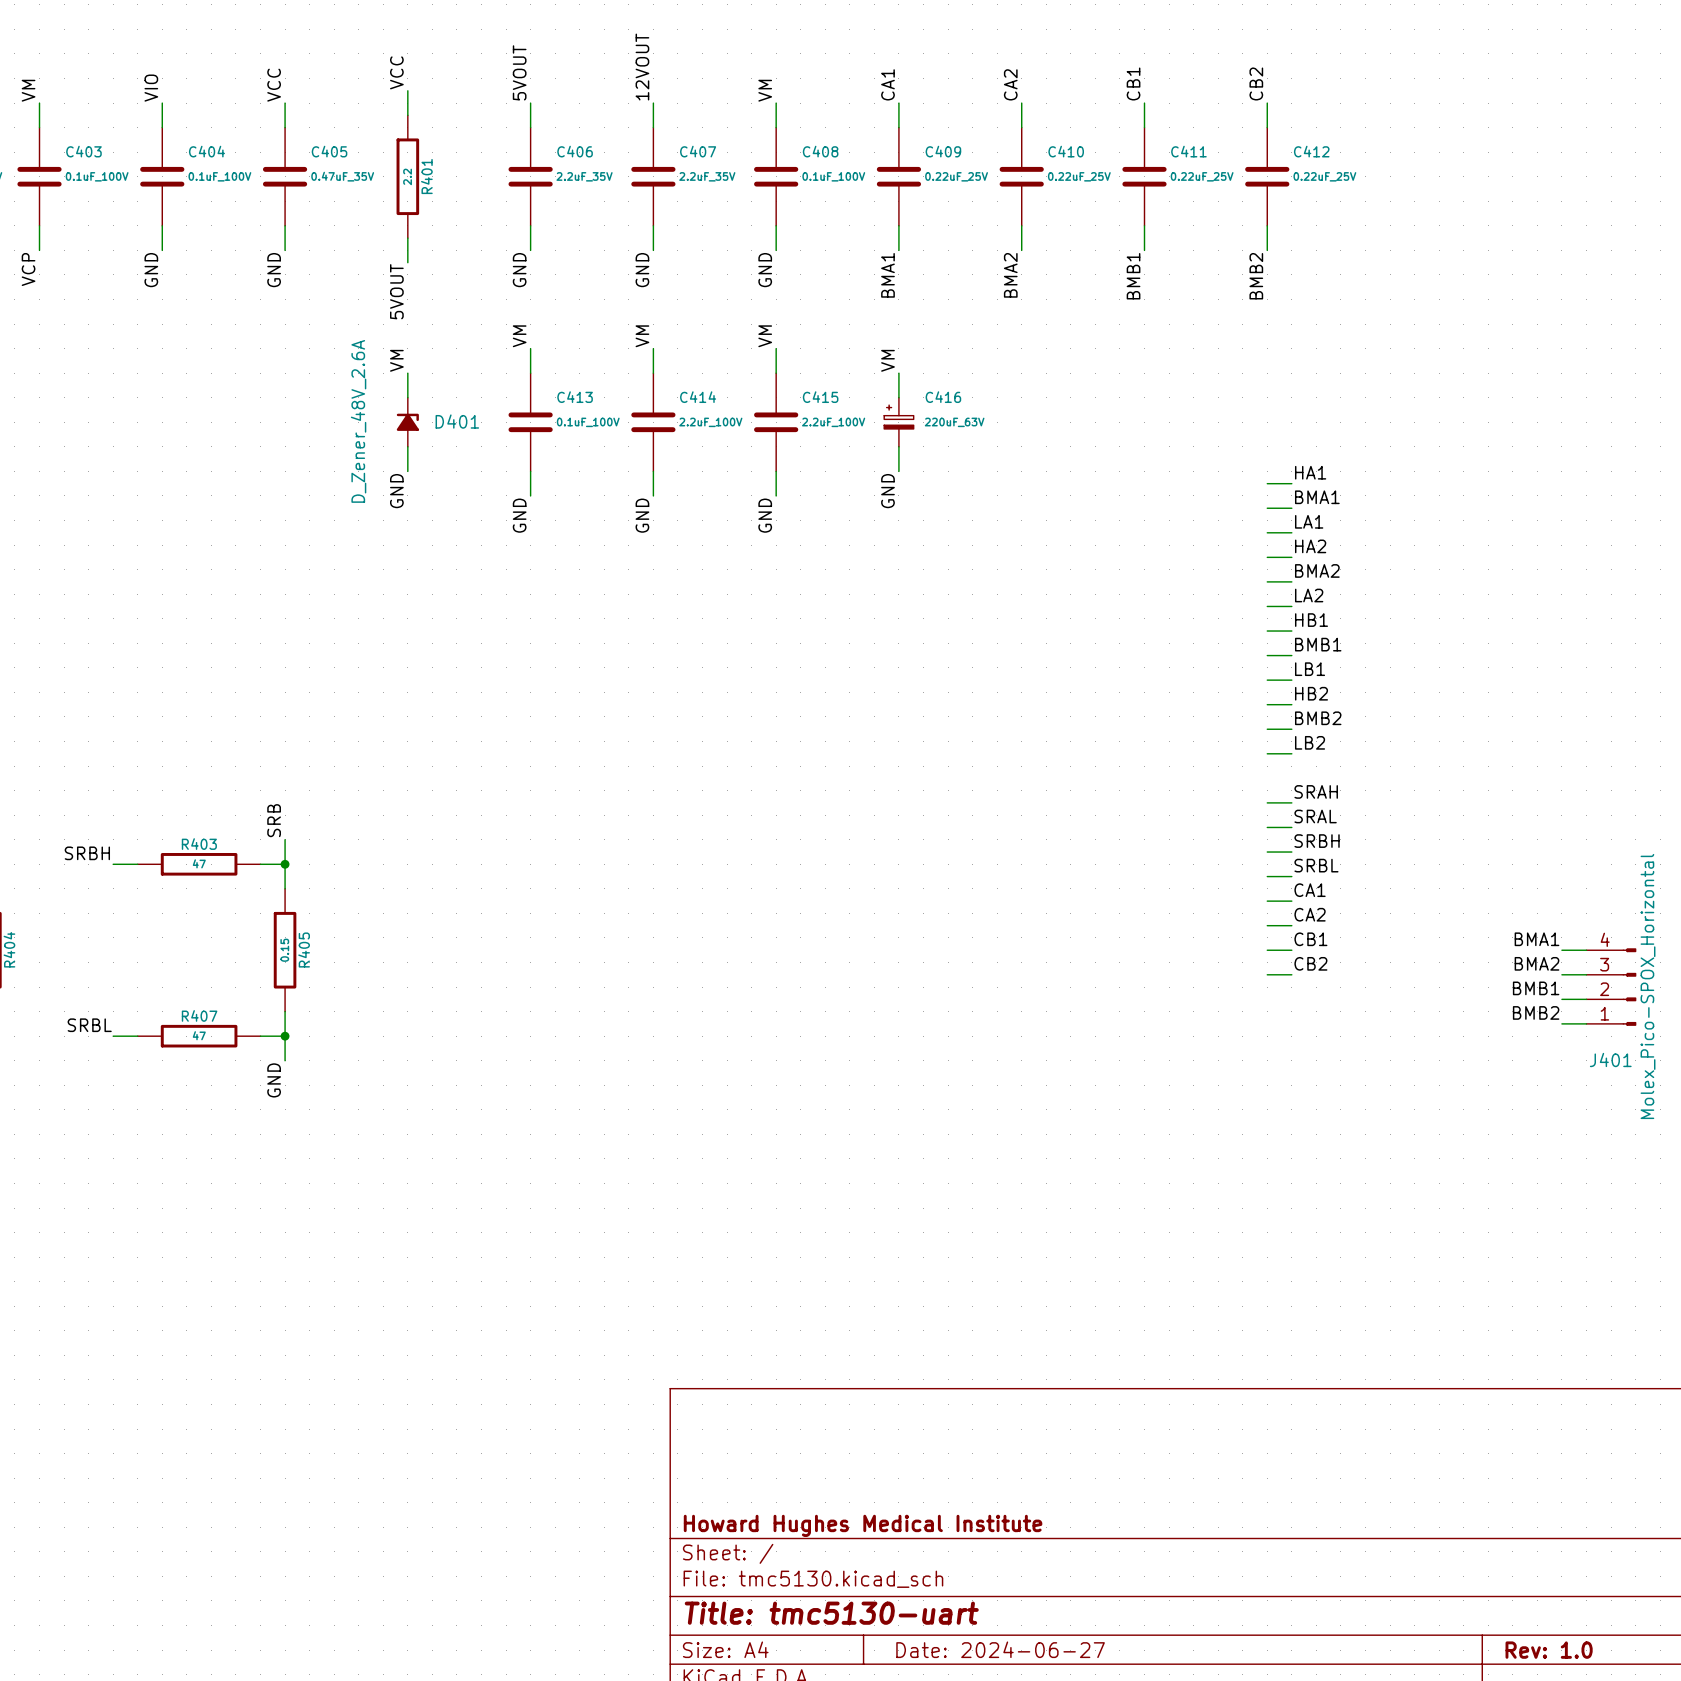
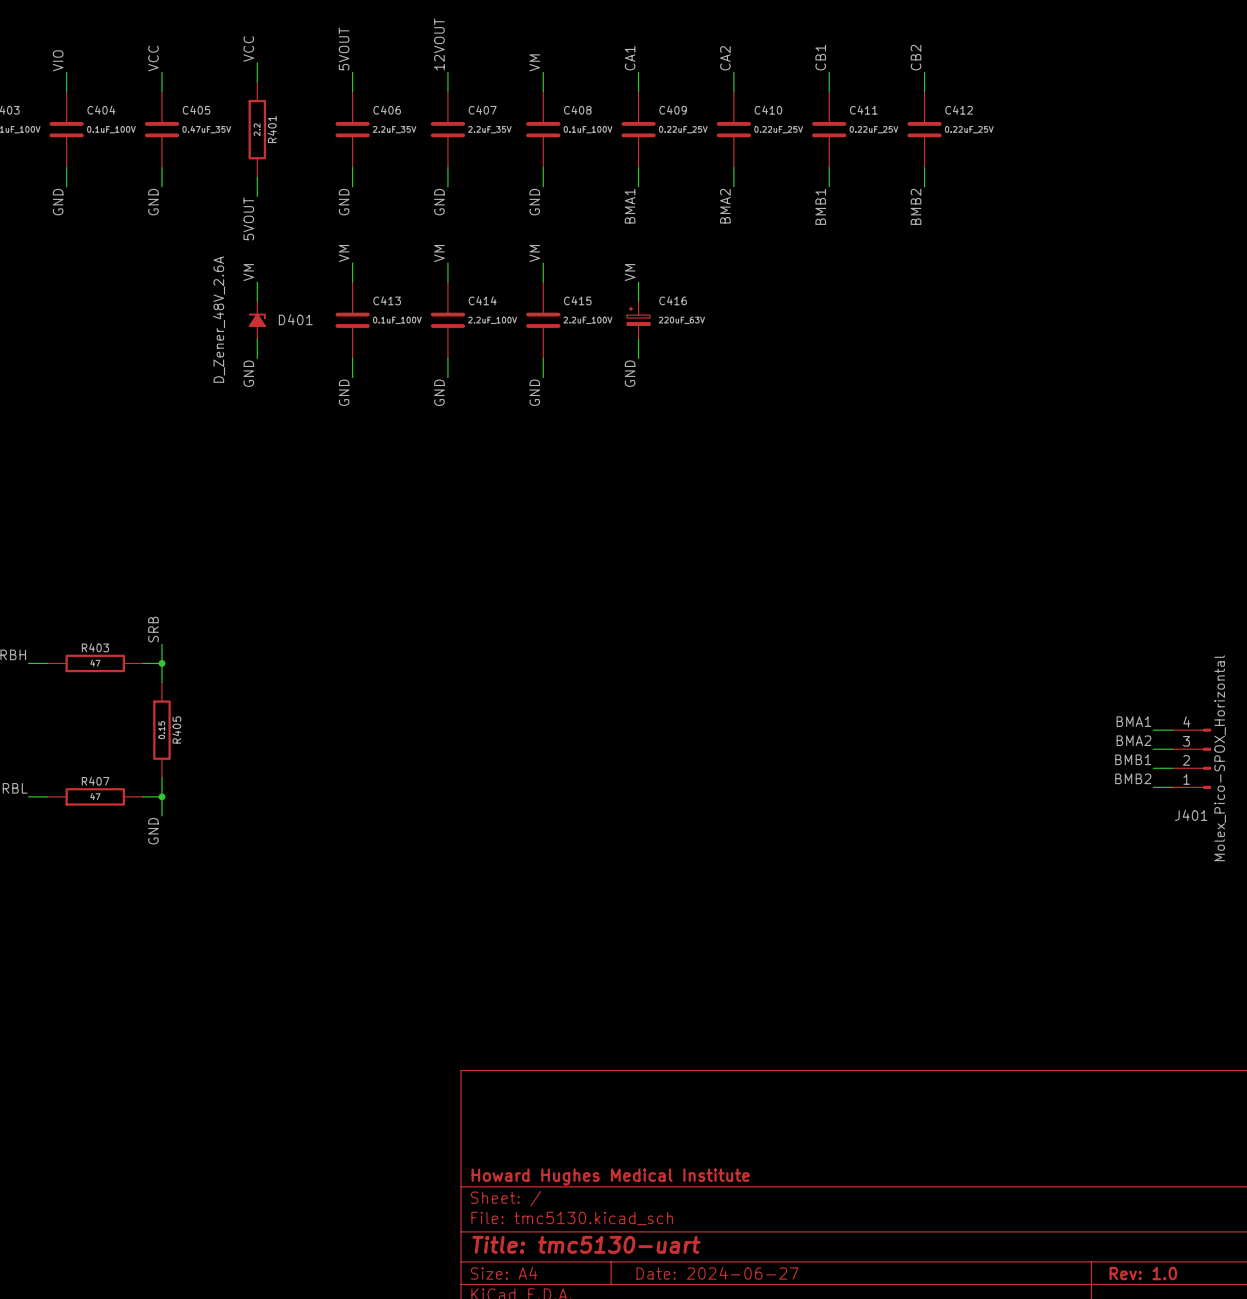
label: HA1 (1310, 472) -> none
wire: (1267, 483) (1291, 483) -> none
label: BMA1 (1317, 497) -> none
wire: (1267, 508) (1291, 508) -> none
label: LA1 (1309, 521) -> none
wire: (1267, 532) (1291, 532) -> none
label: HA2 (1310, 546) -> none
wire: (1267, 557) (1291, 557) -> none
label: BMA2 (1317, 570) -> none
wire: (1267, 581) (1291, 581) -> none
label: LA2 (1309, 595) -> none
wire: (1267, 606) (1291, 606) -> none
label: HB1 (1311, 620) -> none
wire: (1267, 631) (1291, 631) -> none
label: BMB1 (1318, 644) -> none
wire: (1267, 655) (1291, 655) -> none
label: LB1 (1310, 669) -> none
wire: (1267, 680) (1291, 680) -> none
label: HB2 (1311, 693) -> none
wire: (1267, 704) (1291, 704) -> none
label: BMB2 (1318, 718) -> none
wire: (1267, 729) (1291, 729) -> none
label: LB2 (1310, 742) -> none
wire: (1267, 753) (1291, 753) -> none
label: SRAH (1316, 791) -> none
wire: (1267, 802) (1291, 802) -> none
label: SRAL (1315, 816) -> none
wire: (1267, 827) (1291, 827) -> none
label: SRBH (1317, 841) -> none
wire: (1267, 852) (1291, 852) -> none
label: SRBL (1316, 865) -> none
wire: (1267, 876) (1291, 876) -> none
label: CA1 (1310, 890) -> none
wire: (1267, 901) (1291, 901) -> none
label: CA2 (1310, 914) -> none
wire: (1267, 925) (1291, 925) -> none
label: CB1 (1310, 939) -> none
wire: (1267, 950) (1291, 950) -> none
label: CB2 (1310, 963) -> none
wire: (1267, 974) (1291, 974) -> none

